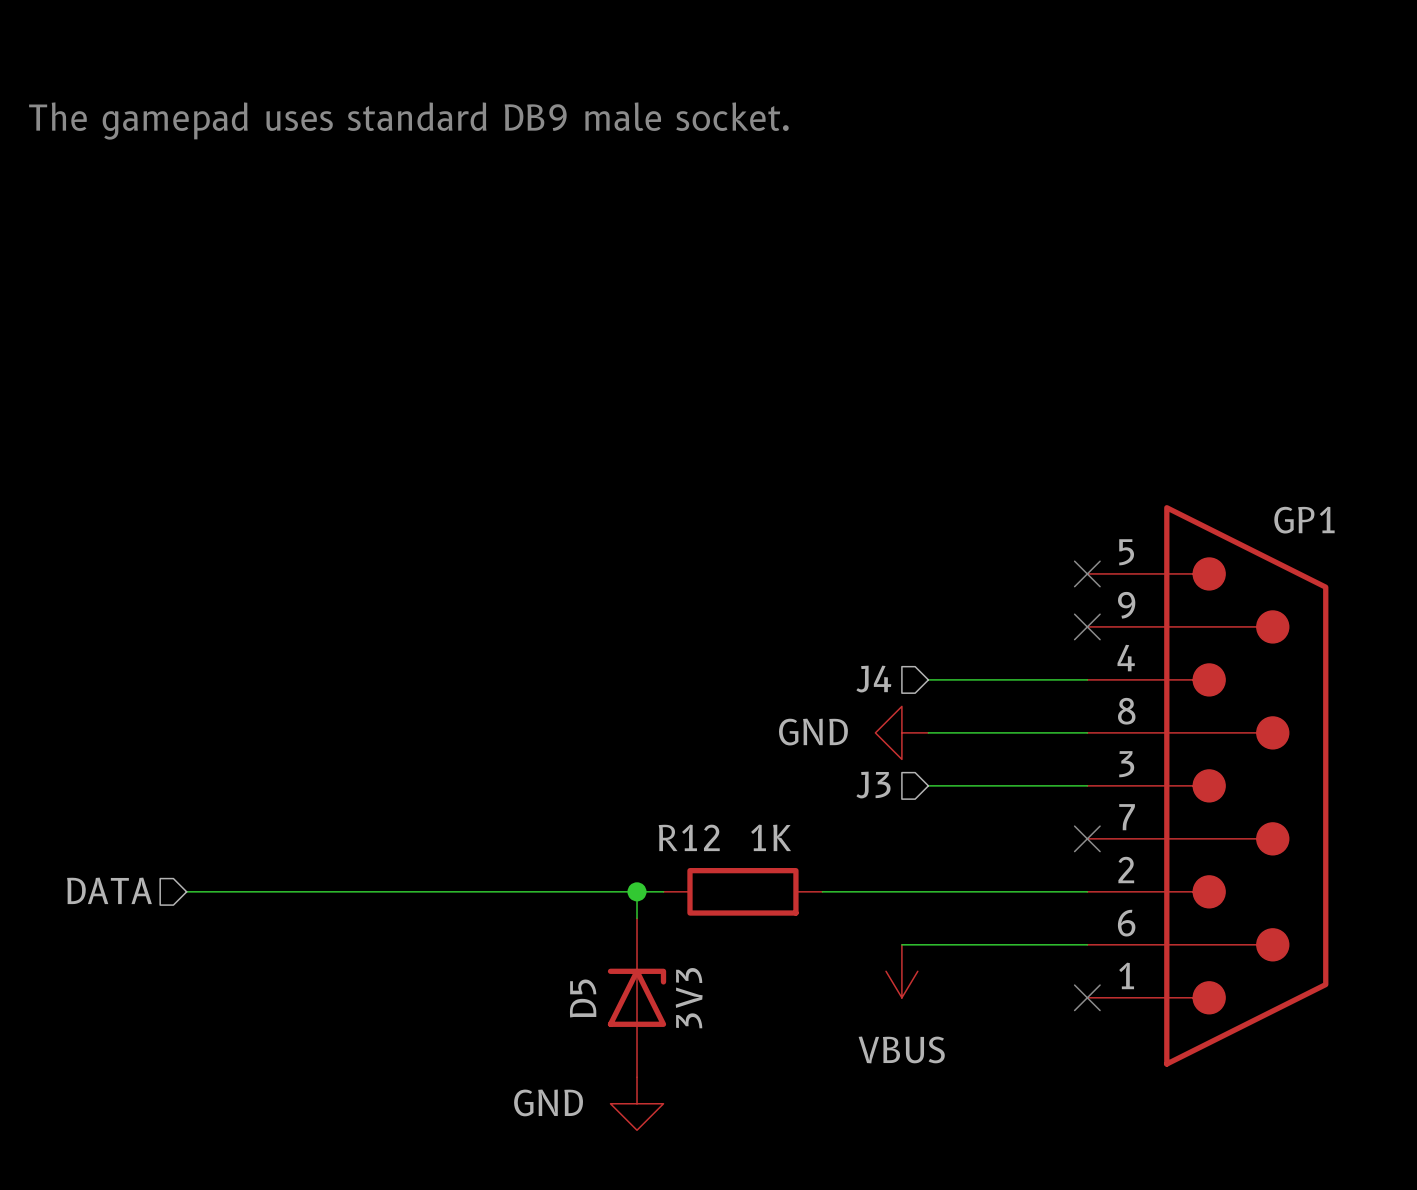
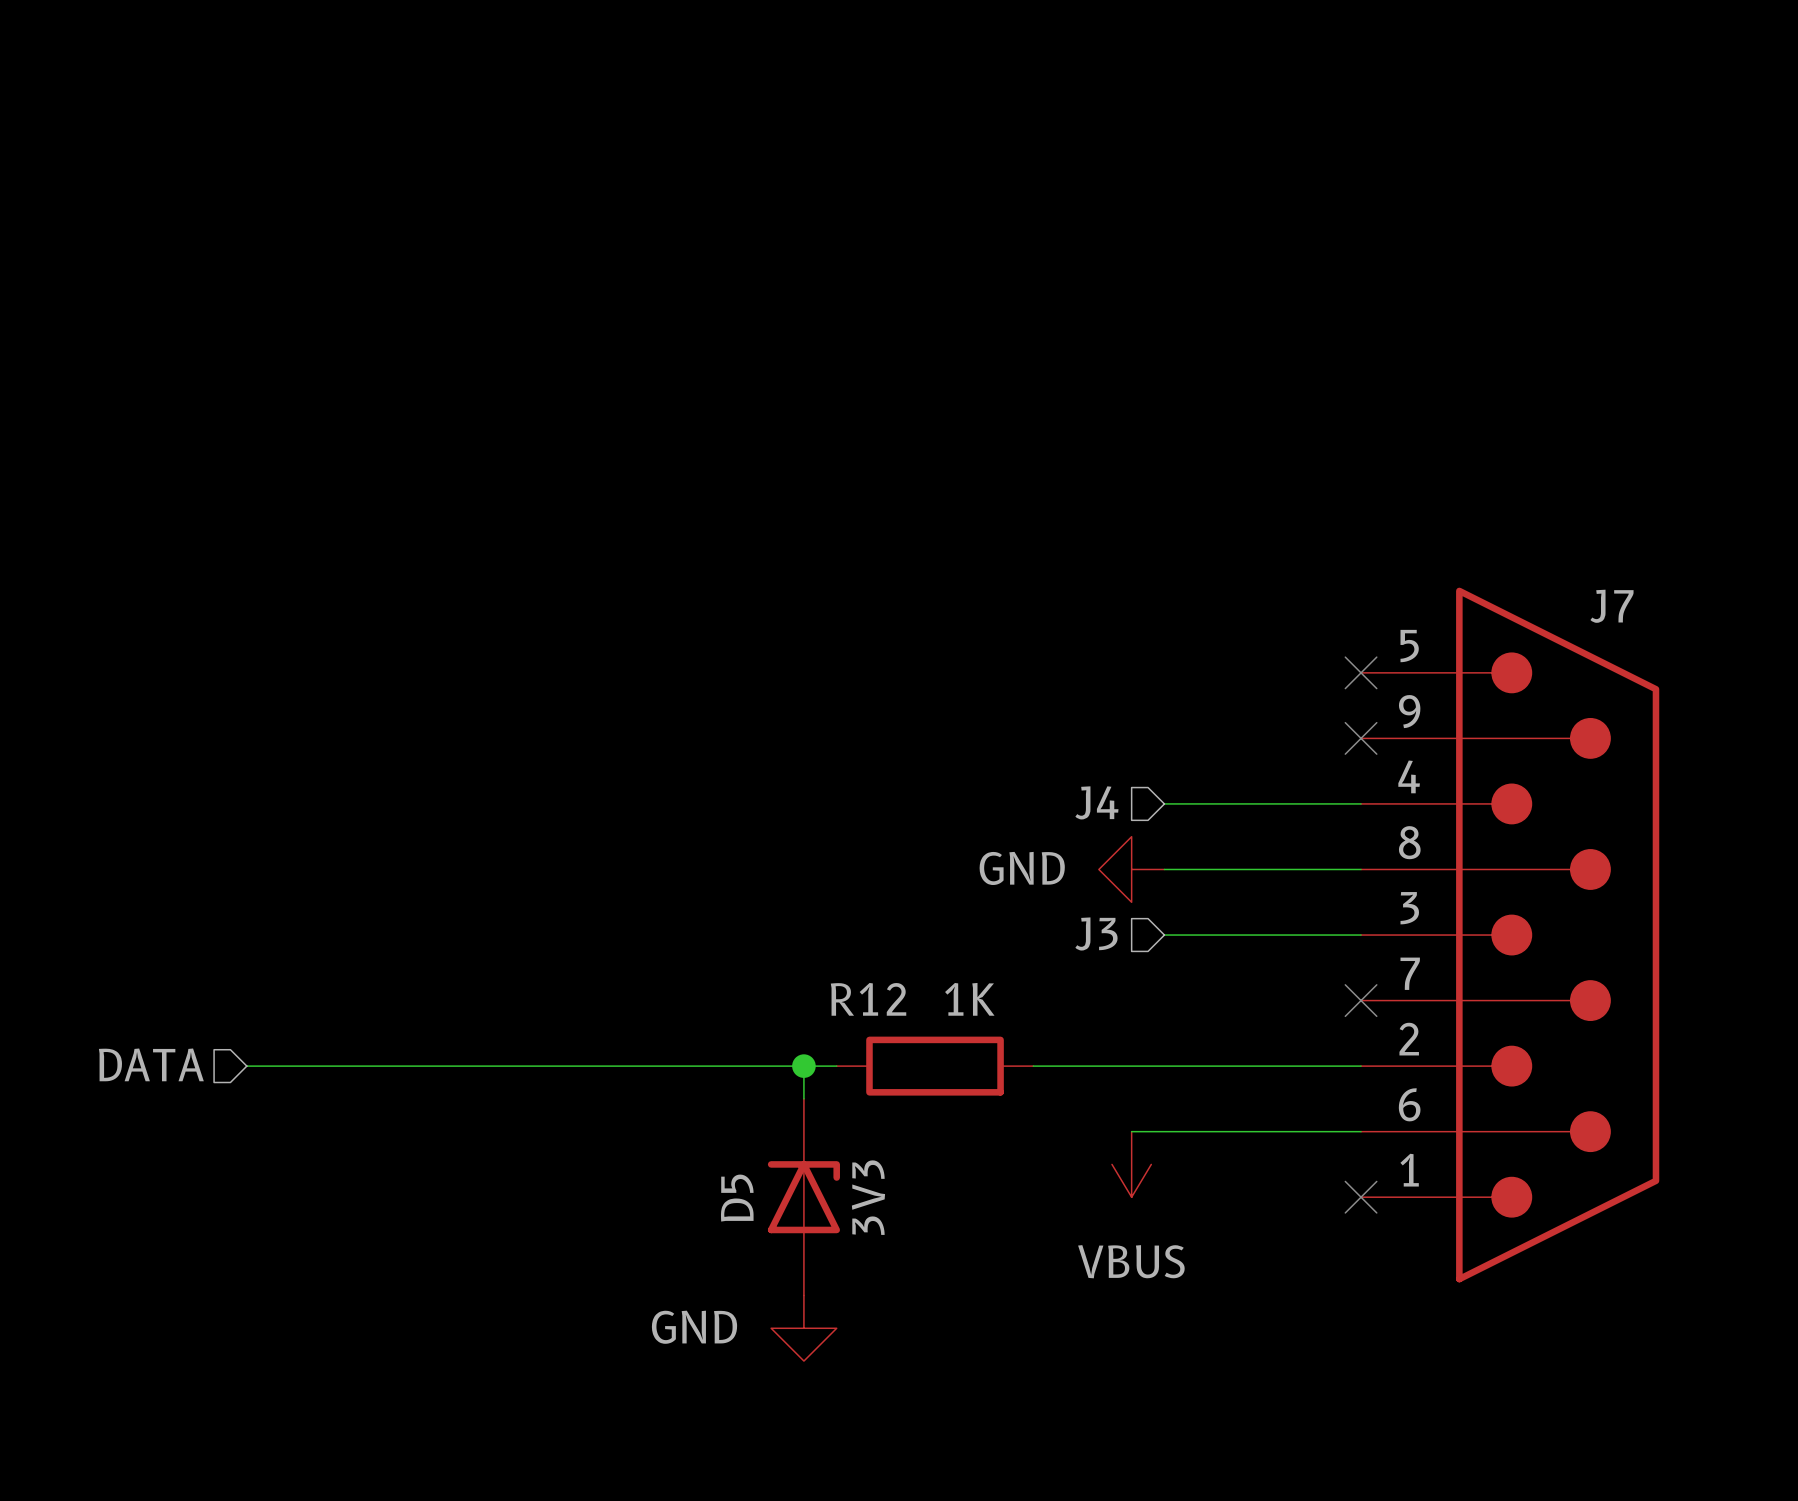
text: The gamepad uses standard DB9 male socket. (408, 121) -> none
GP1 name: GP1 (1304, 520) -> J7 (1612, 606)

